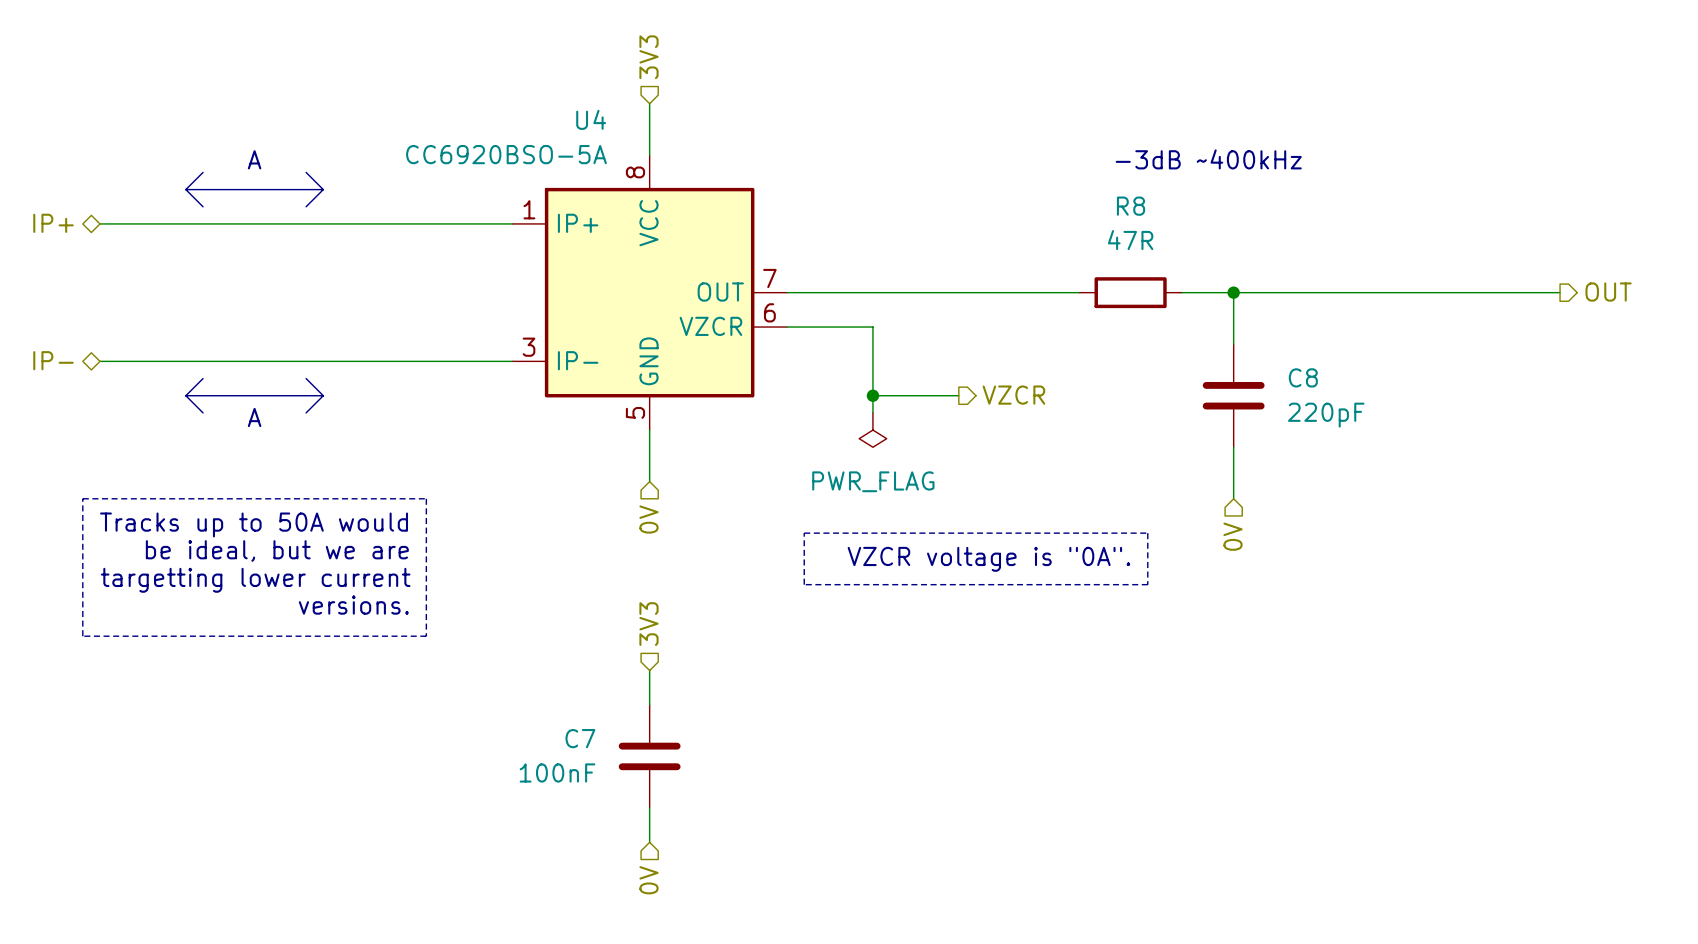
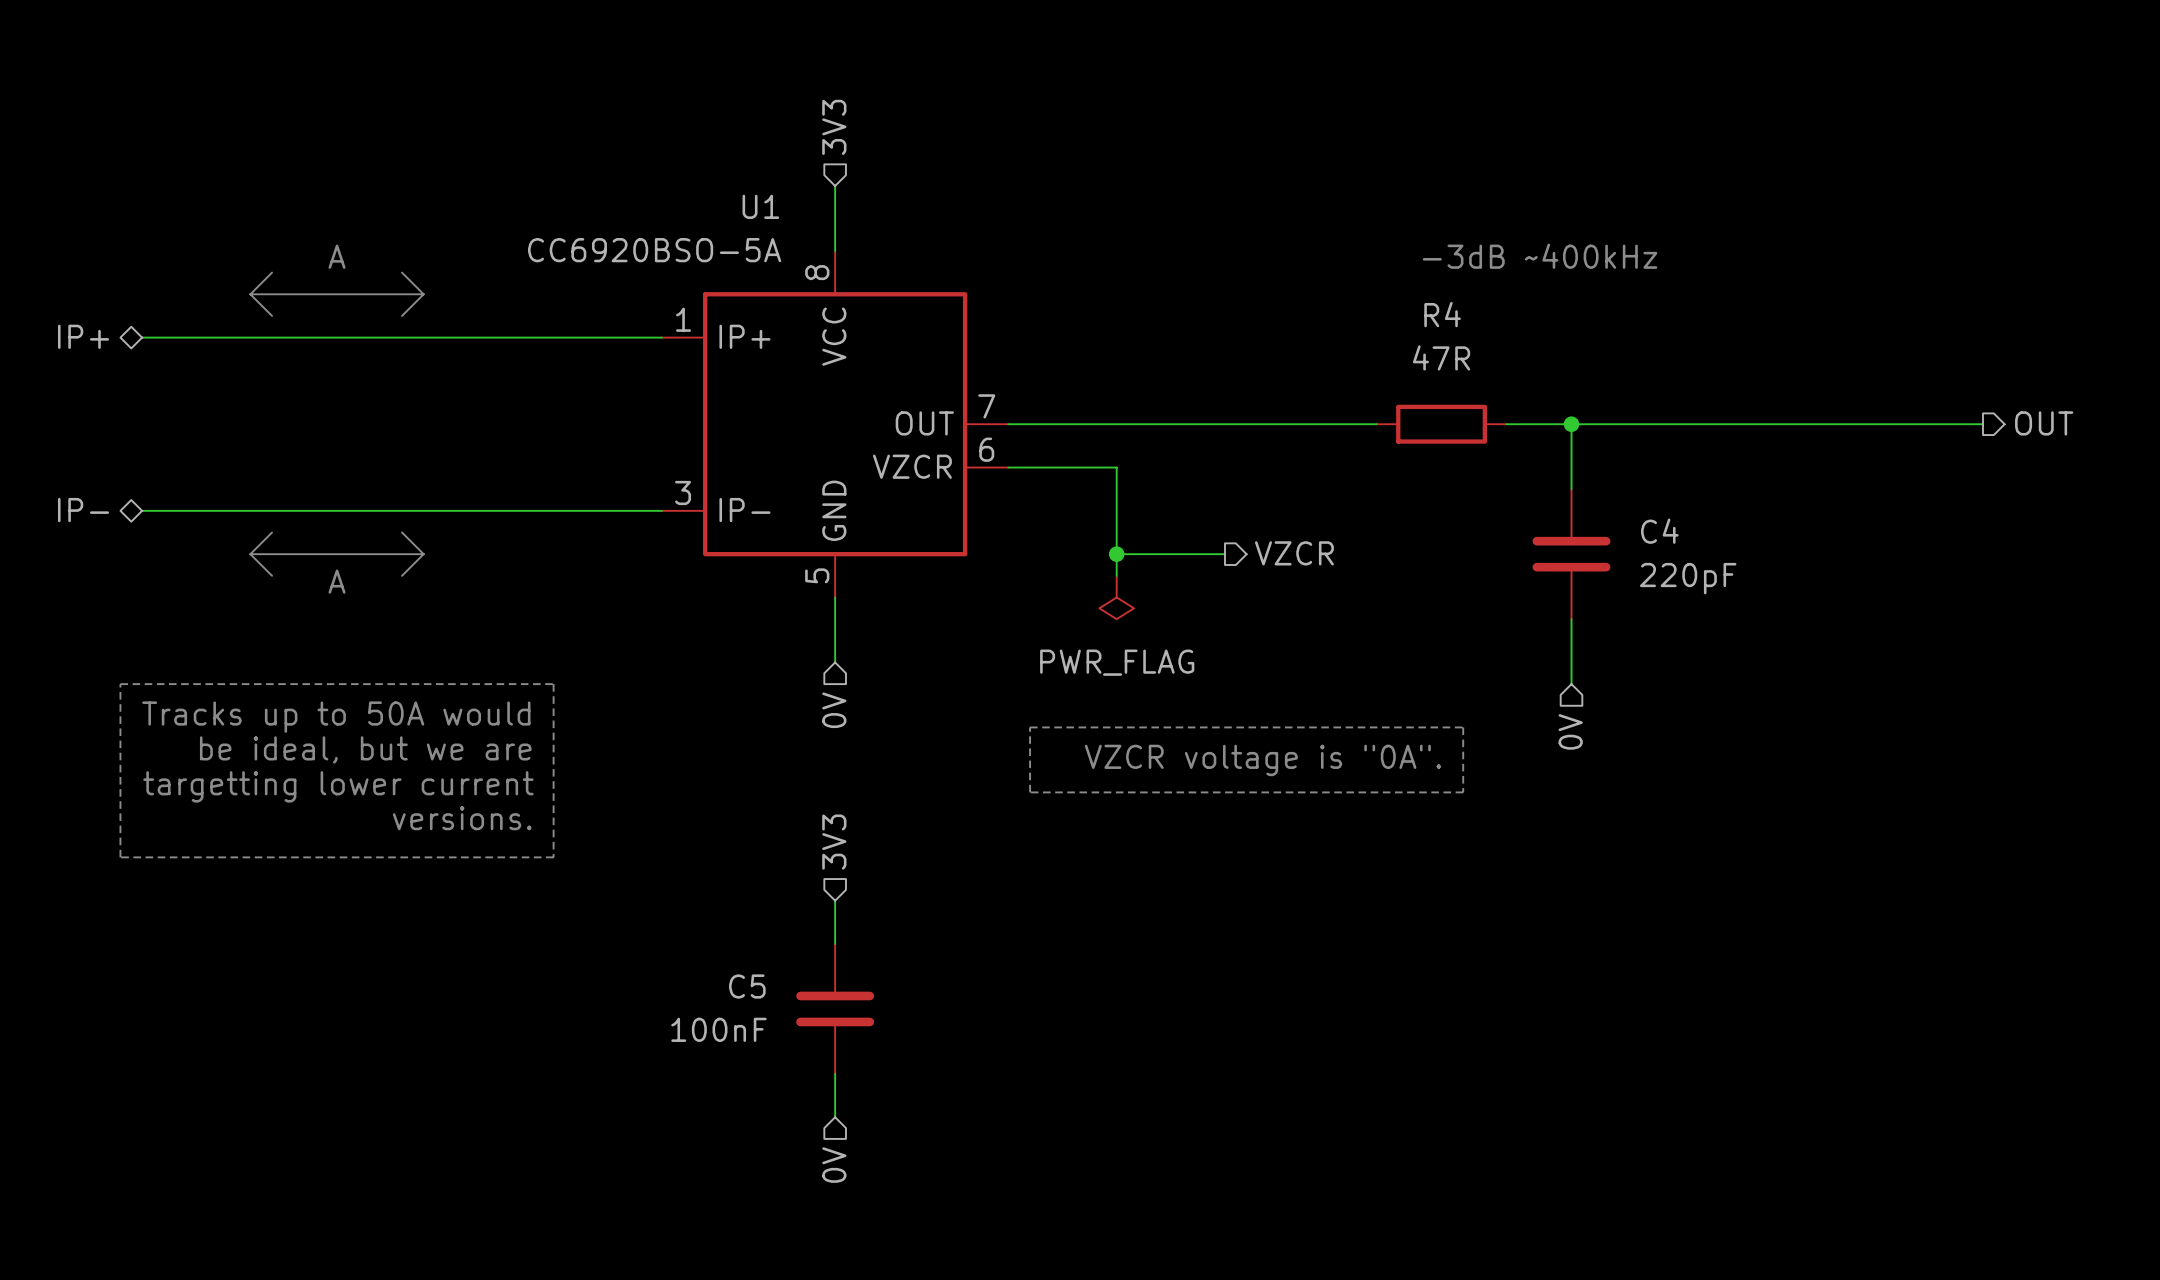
U4 name: U4 (591, 119) -> U1 (760, 206)
R8 name: R8 (1131, 206) -> R4 (1442, 314)
C8 name: C8 (1303, 377) -> C4 (1659, 531)
C7 name: C7 (580, 738) -> C5 (747, 986)

